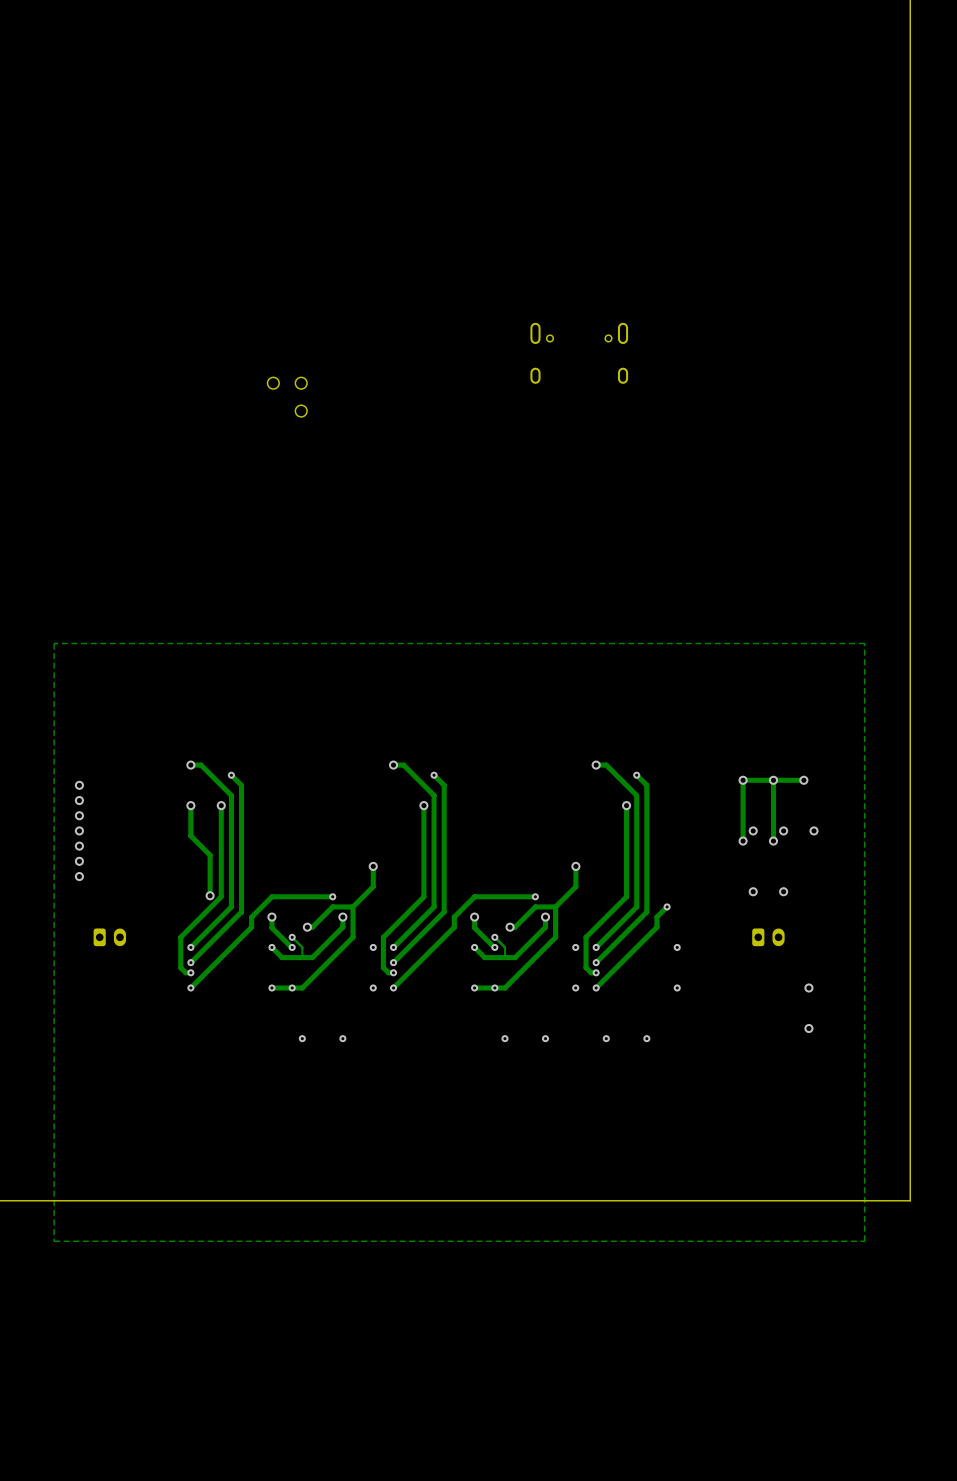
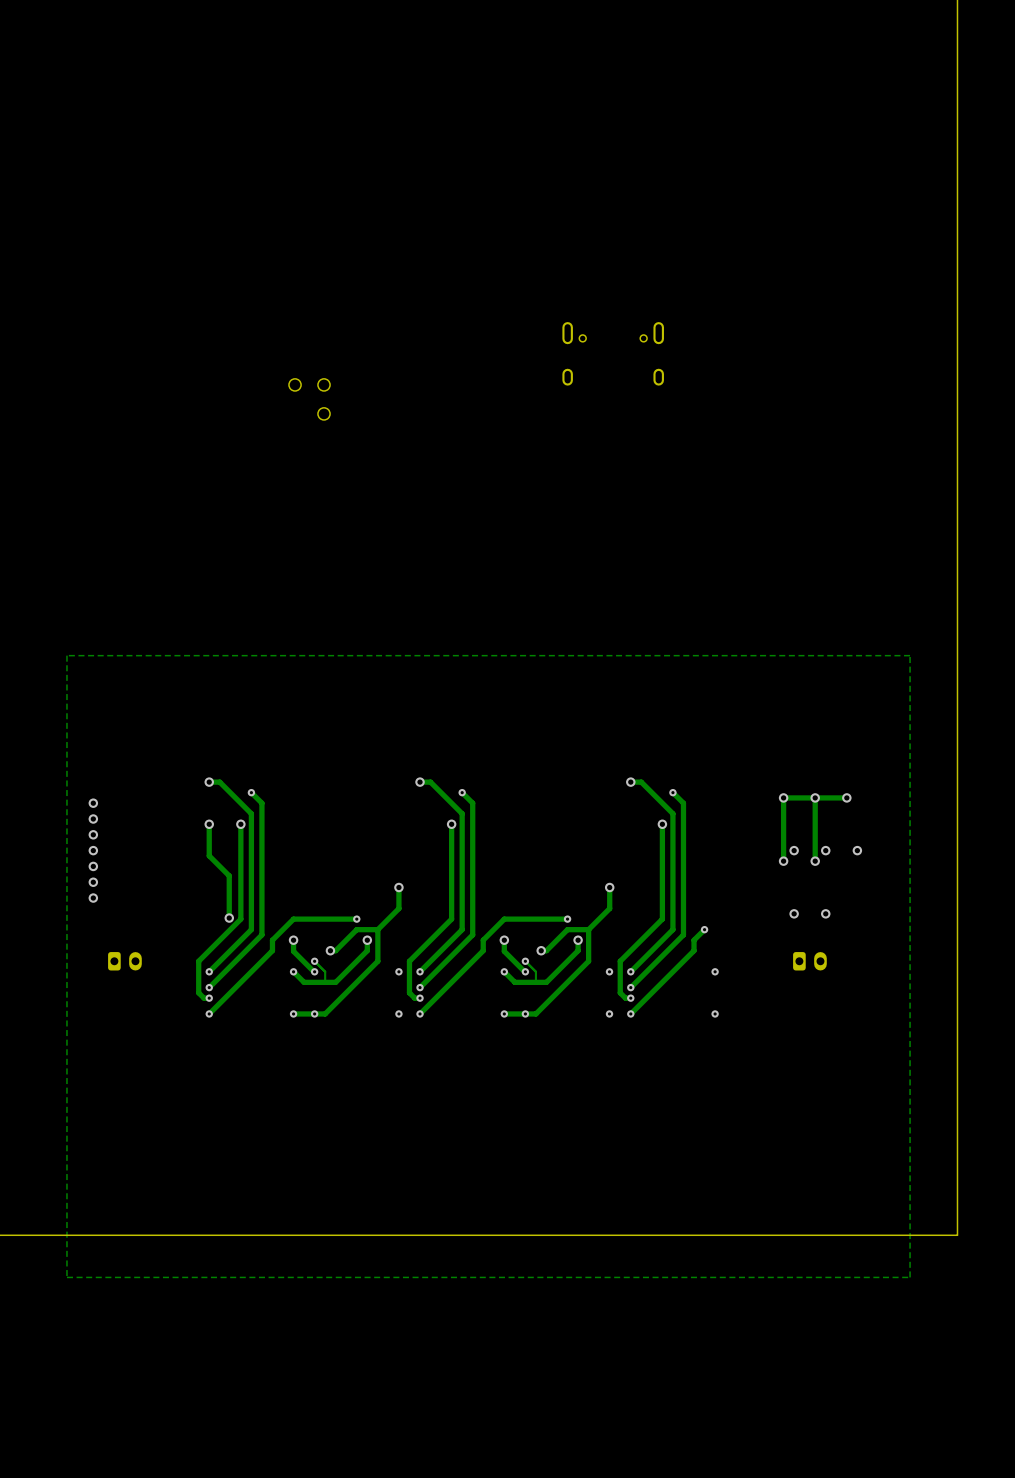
via: (808, 987) -> none
via: (808, 1028) -> none
via: (302, 1038) -> none
via: (342, 1038) -> none
via: (504, 1038) -> none
via: (545, 1038) -> none
via: (606, 1038) -> none
via: (646, 1038) -> none

